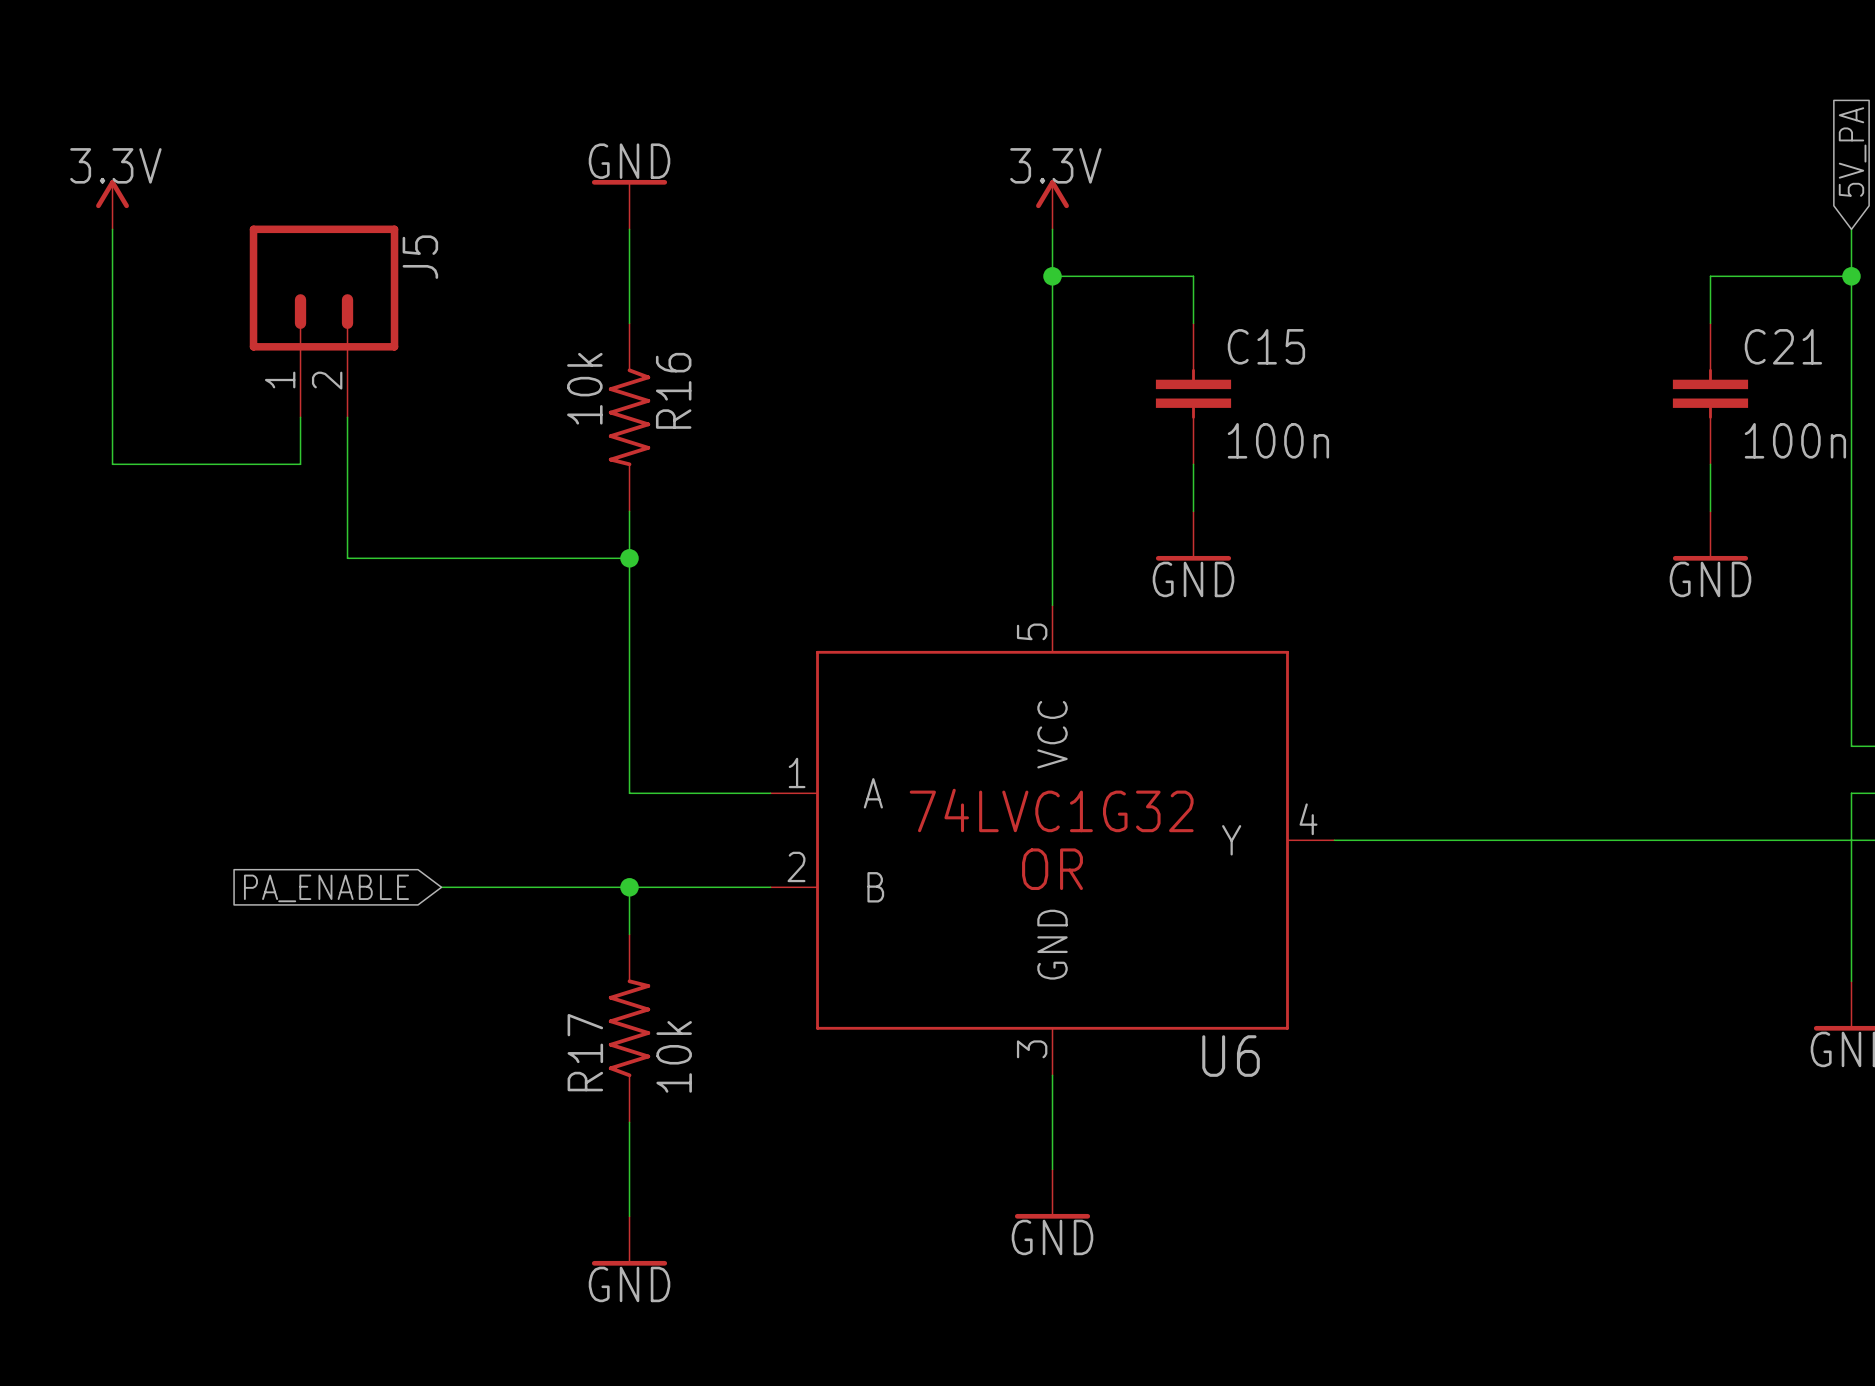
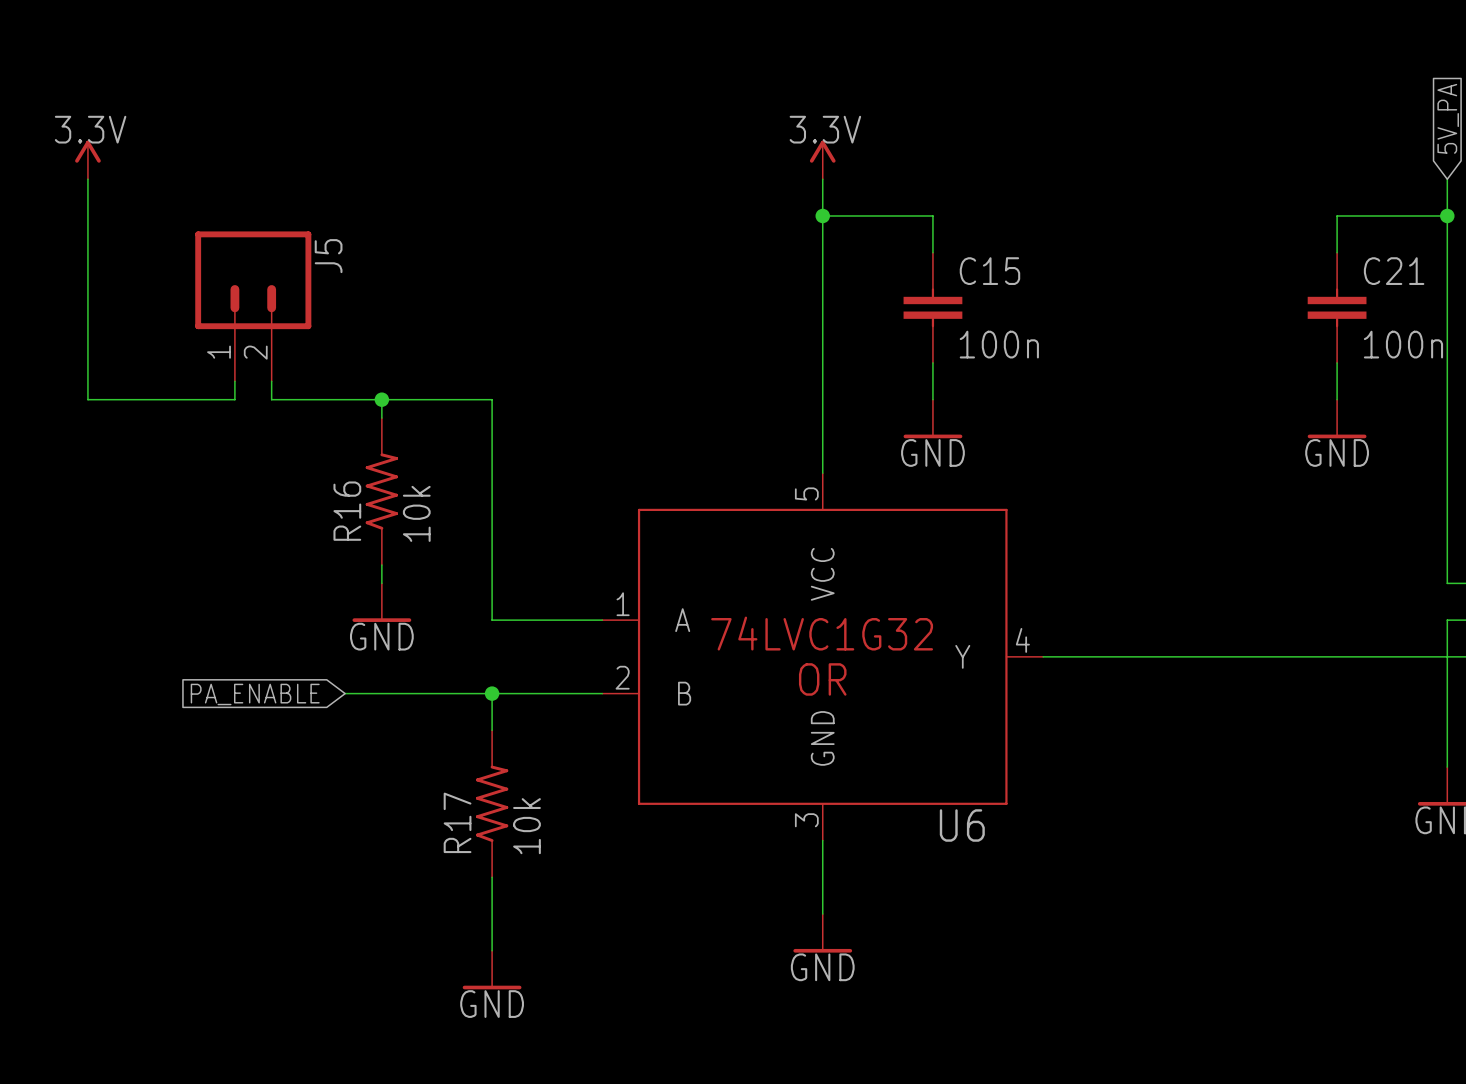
power symbol: GND (629, 204) -> none
wire: (629, 229) (629, 323) -> none
J5 position: (324, 321) -> (253, 306)
wire: (300, 417) (300, 464) (112, 464) -> (234, 381) (234, 399) (87, 399) (87, 362)
R16 rotation: 0° (629, 417) -> 180° (381, 491)
R16 position: (629, 417) -> (381, 491)
wire: (347, 511) (347, 558) (629, 558) -> (271, 399) (492, 399)
wire: none -> (381, 399) (381, 418)
junction: none -> (381, 399)
junction: (629, 558) -> none
wire: none -> (381, 565) (381, 583)
power symbol: none -> GND (381, 602)

